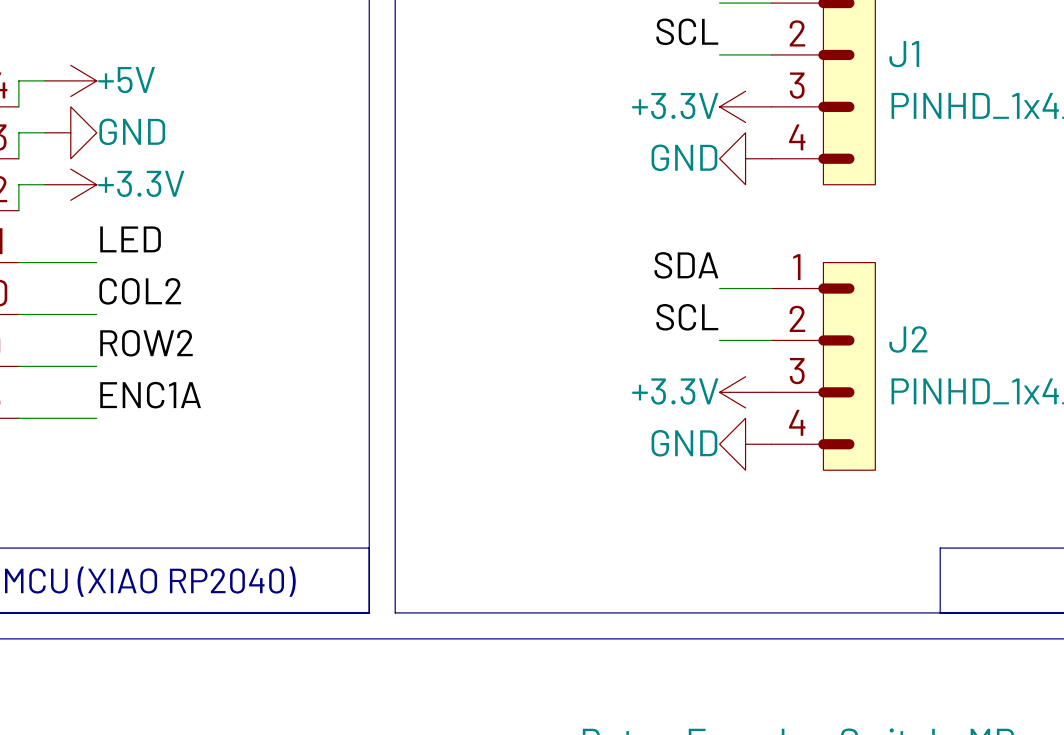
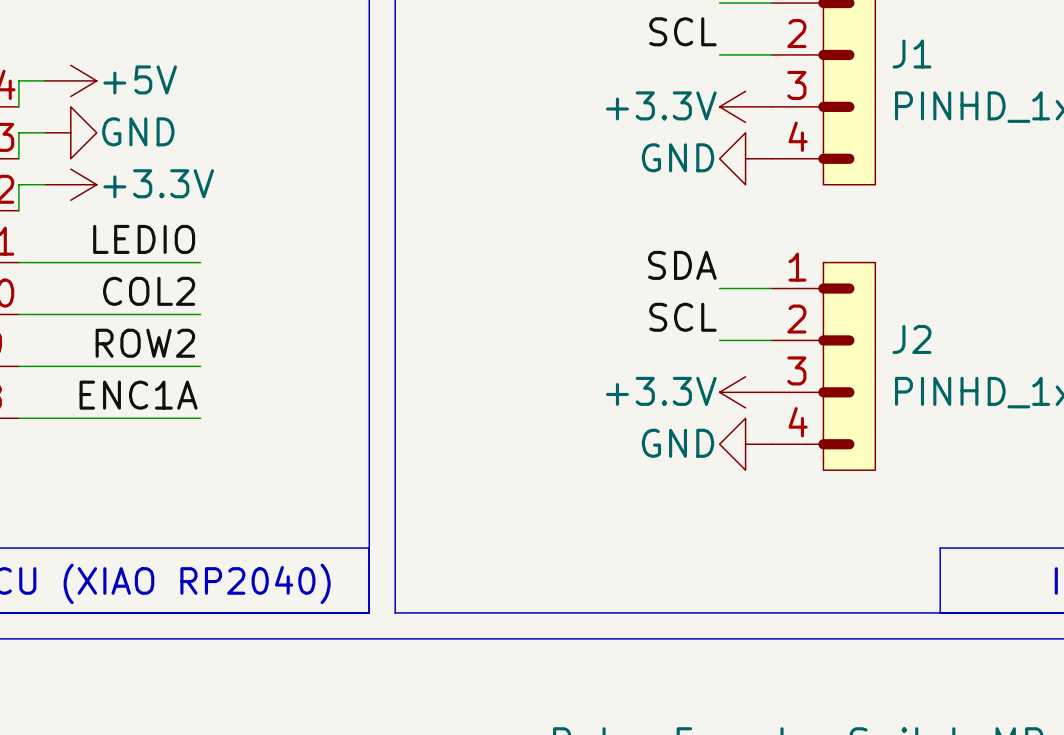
label: LED (130, 239) -> LEDIO (144, 239)
wire: none -> (96, 262) (200, 262)
label position: COL2 (140, 291) -> COL2 (149, 291)
wire: none -> (96, 314) (200, 314)
label position: ROW2 (146, 343) -> ROW2 (145, 343)
wire: none -> (96, 366) (200, 366)
label position: ENC1A (150, 395) -> ENC1A (138, 395)
wire: none -> (96, 418) (200, 418)

